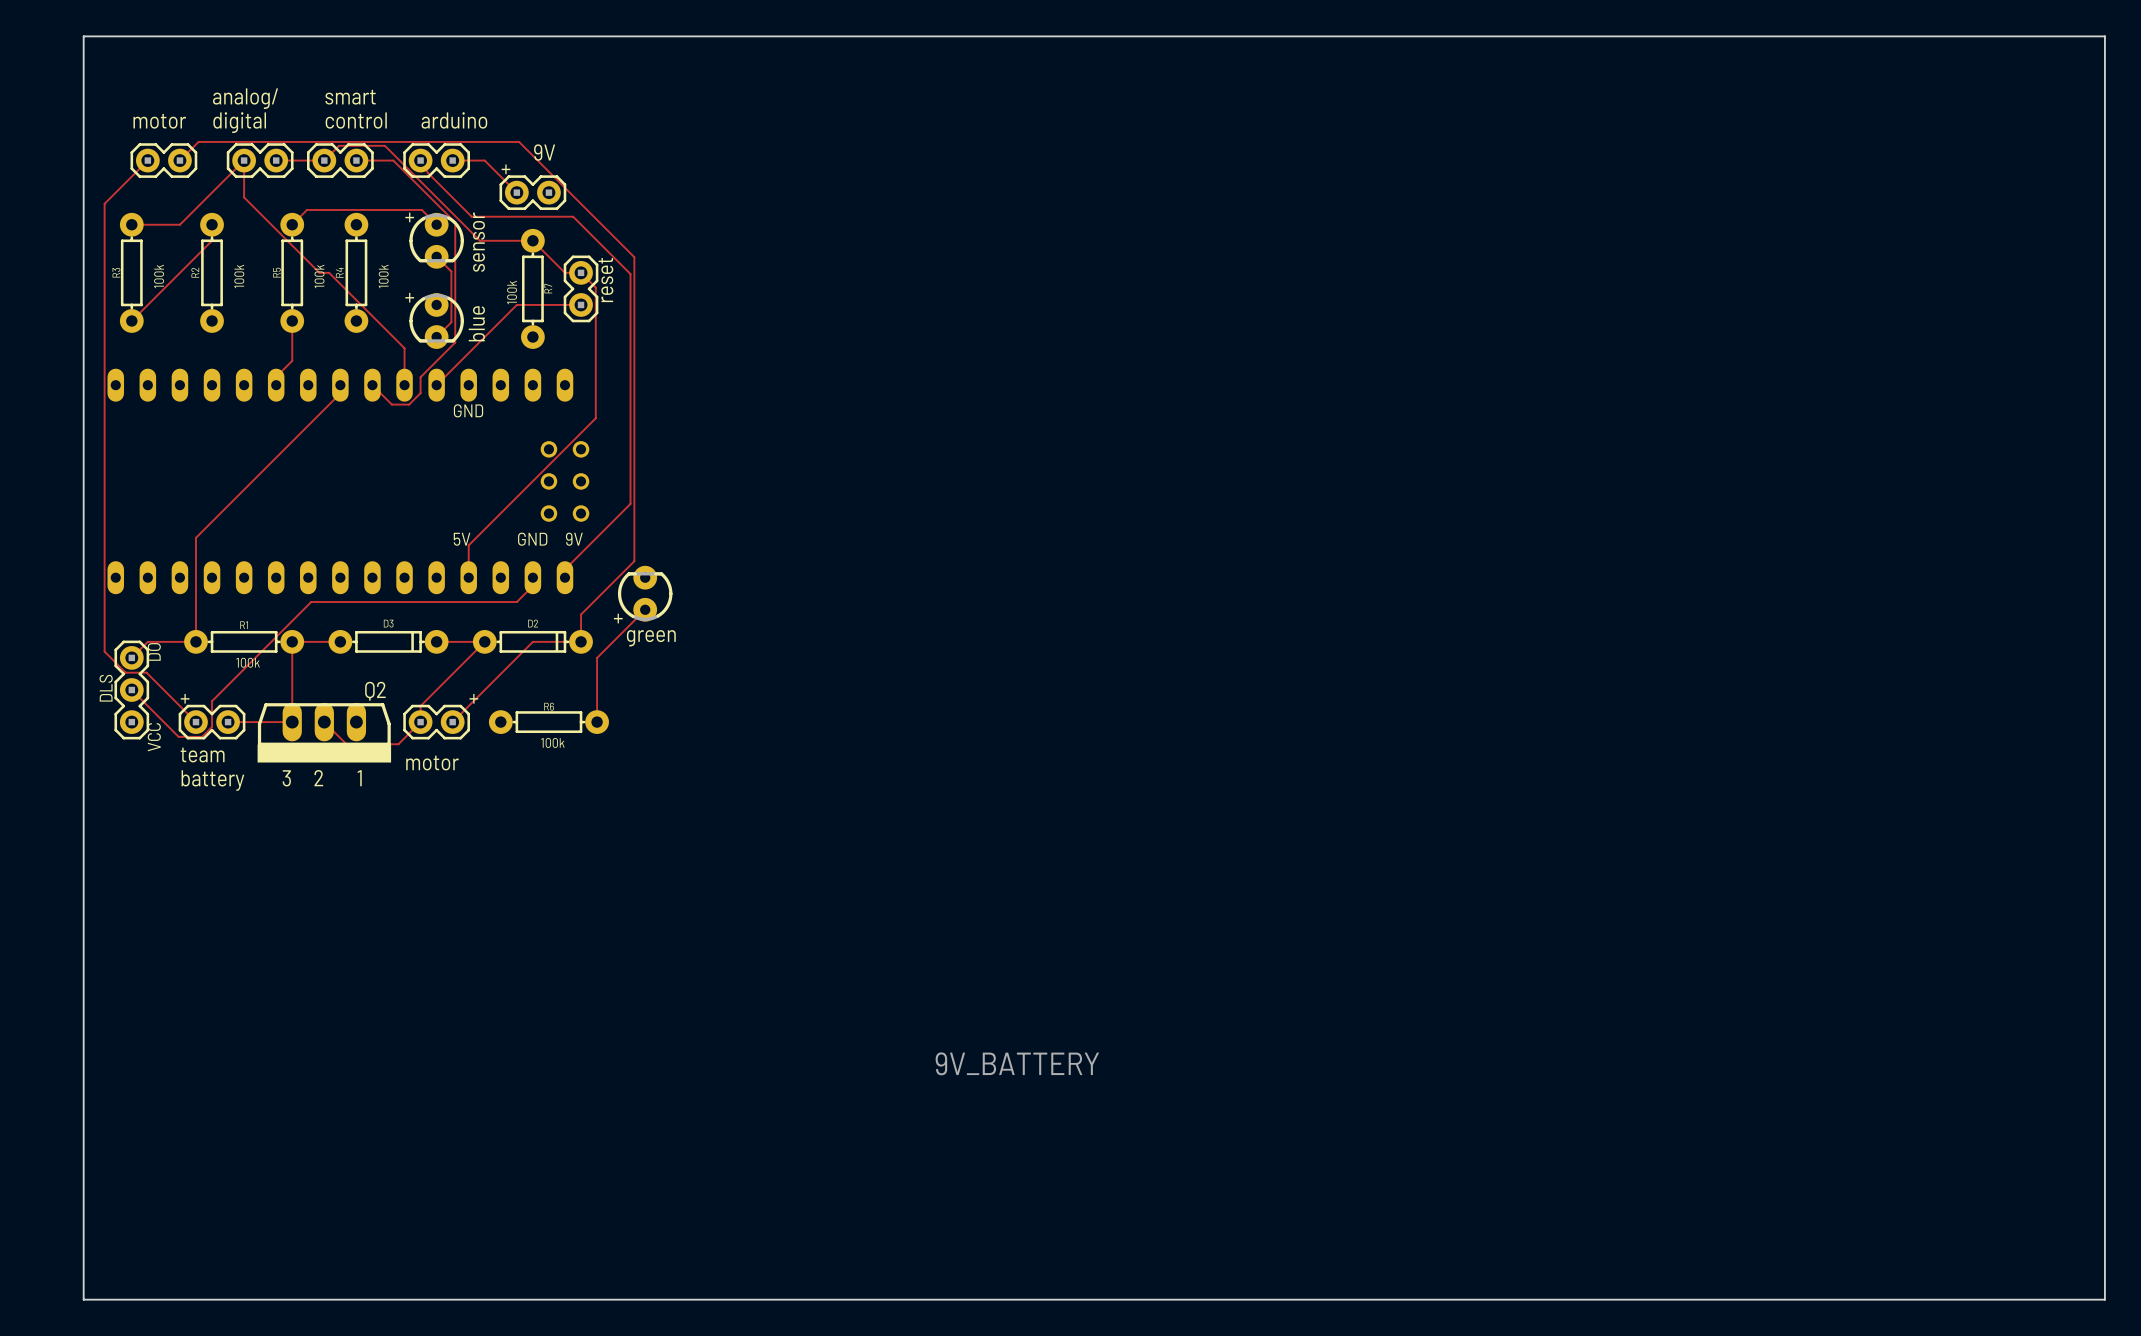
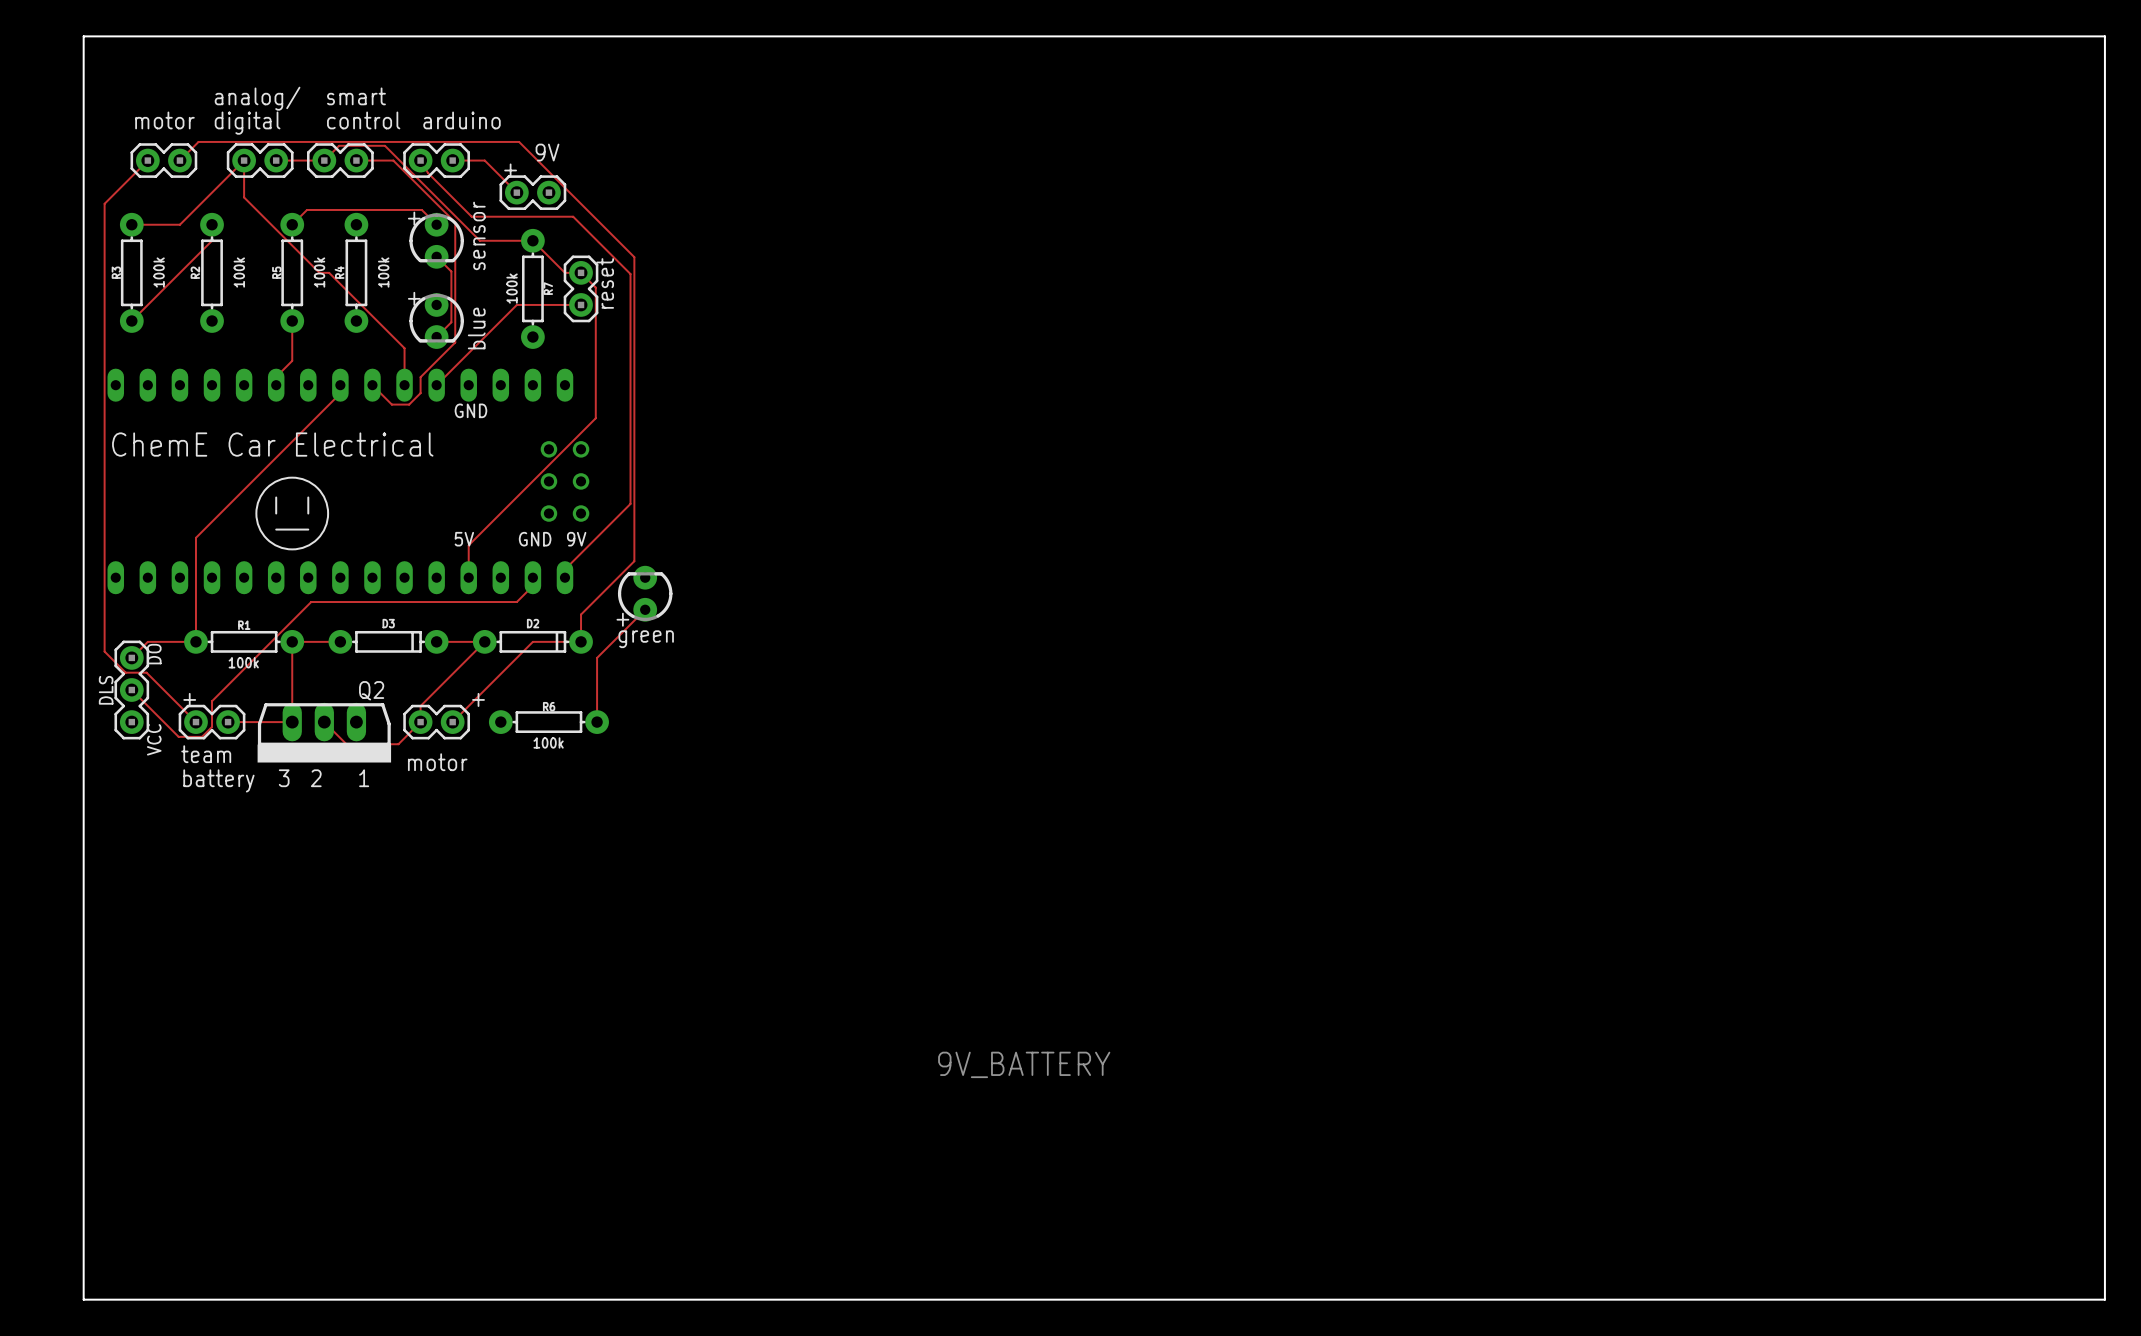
text: none -> ChemE Car Electrical (272, 444)
drawing: none -> [255, 476, 330, 551]
line: none -> (276, 497) (276, 513)
line: none -> (308, 497) (308, 513)
line: none -> (276, 529) (308, 529)

